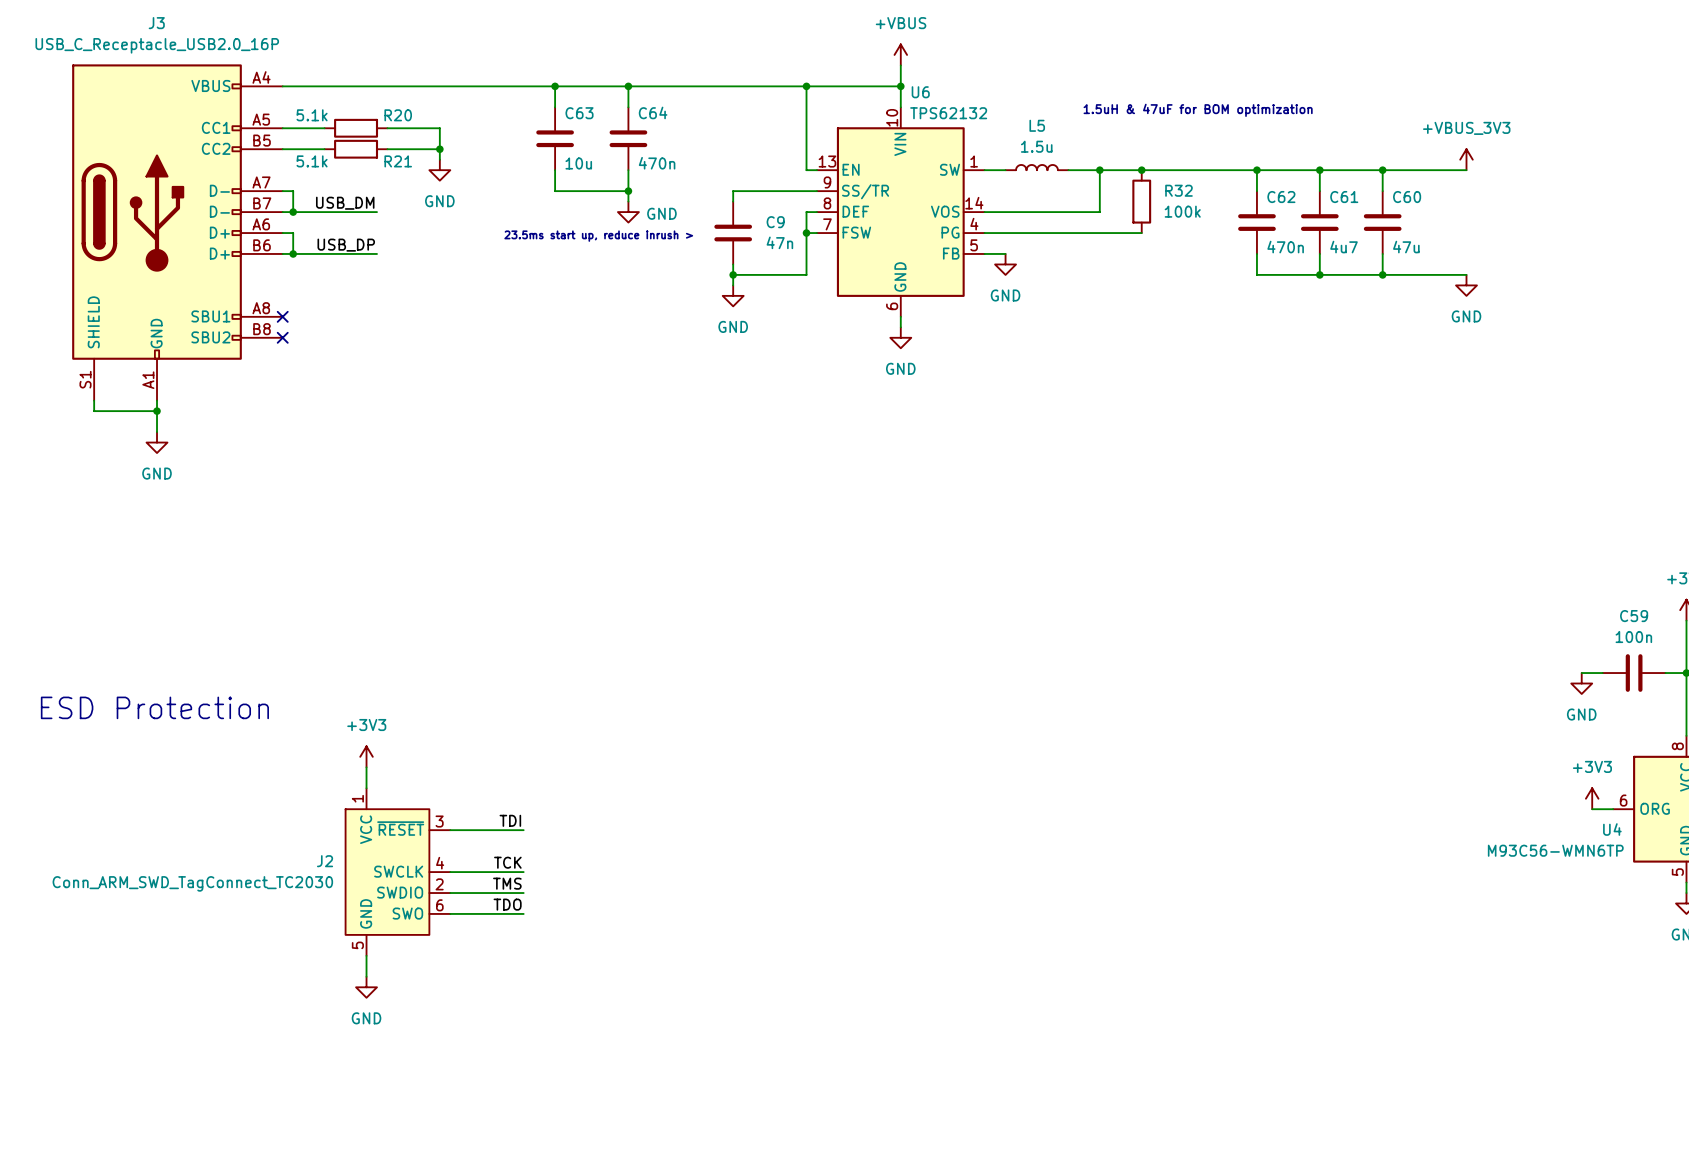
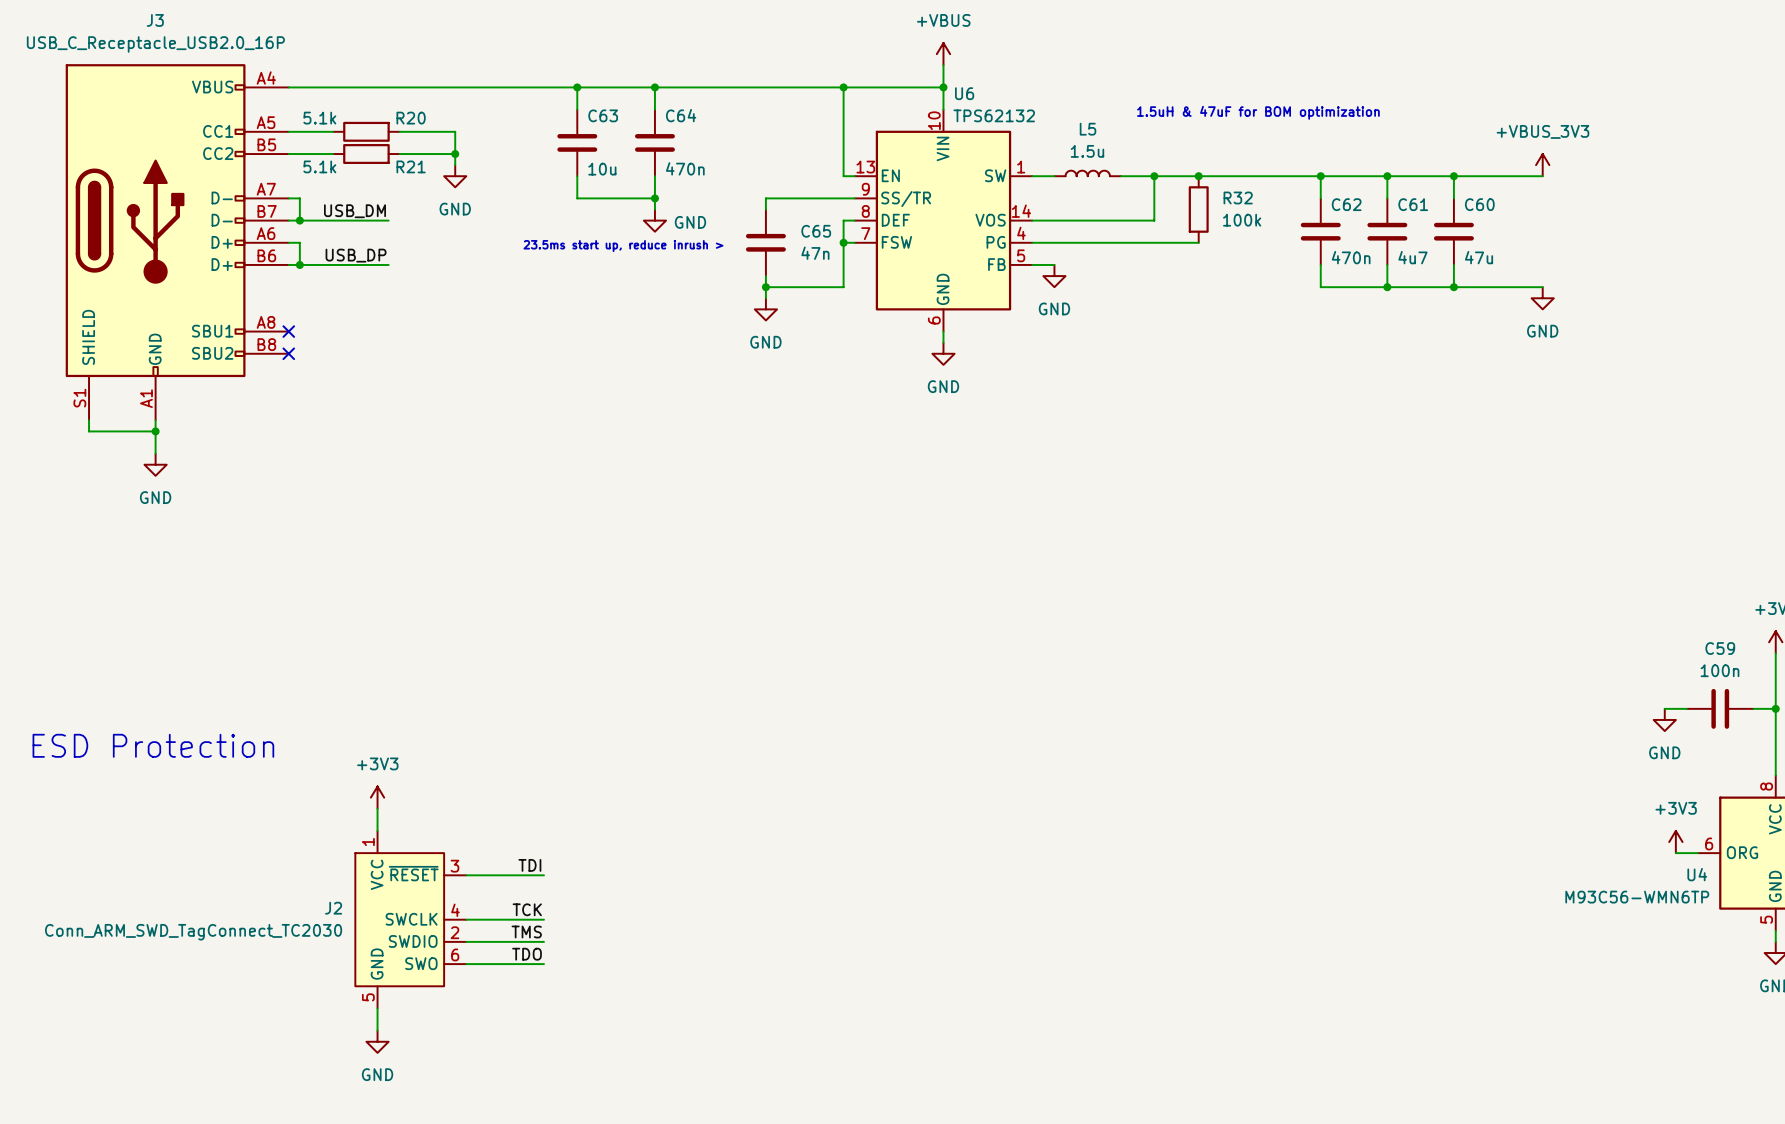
C9 name: C9 (775, 222) -> C65 (816, 231)

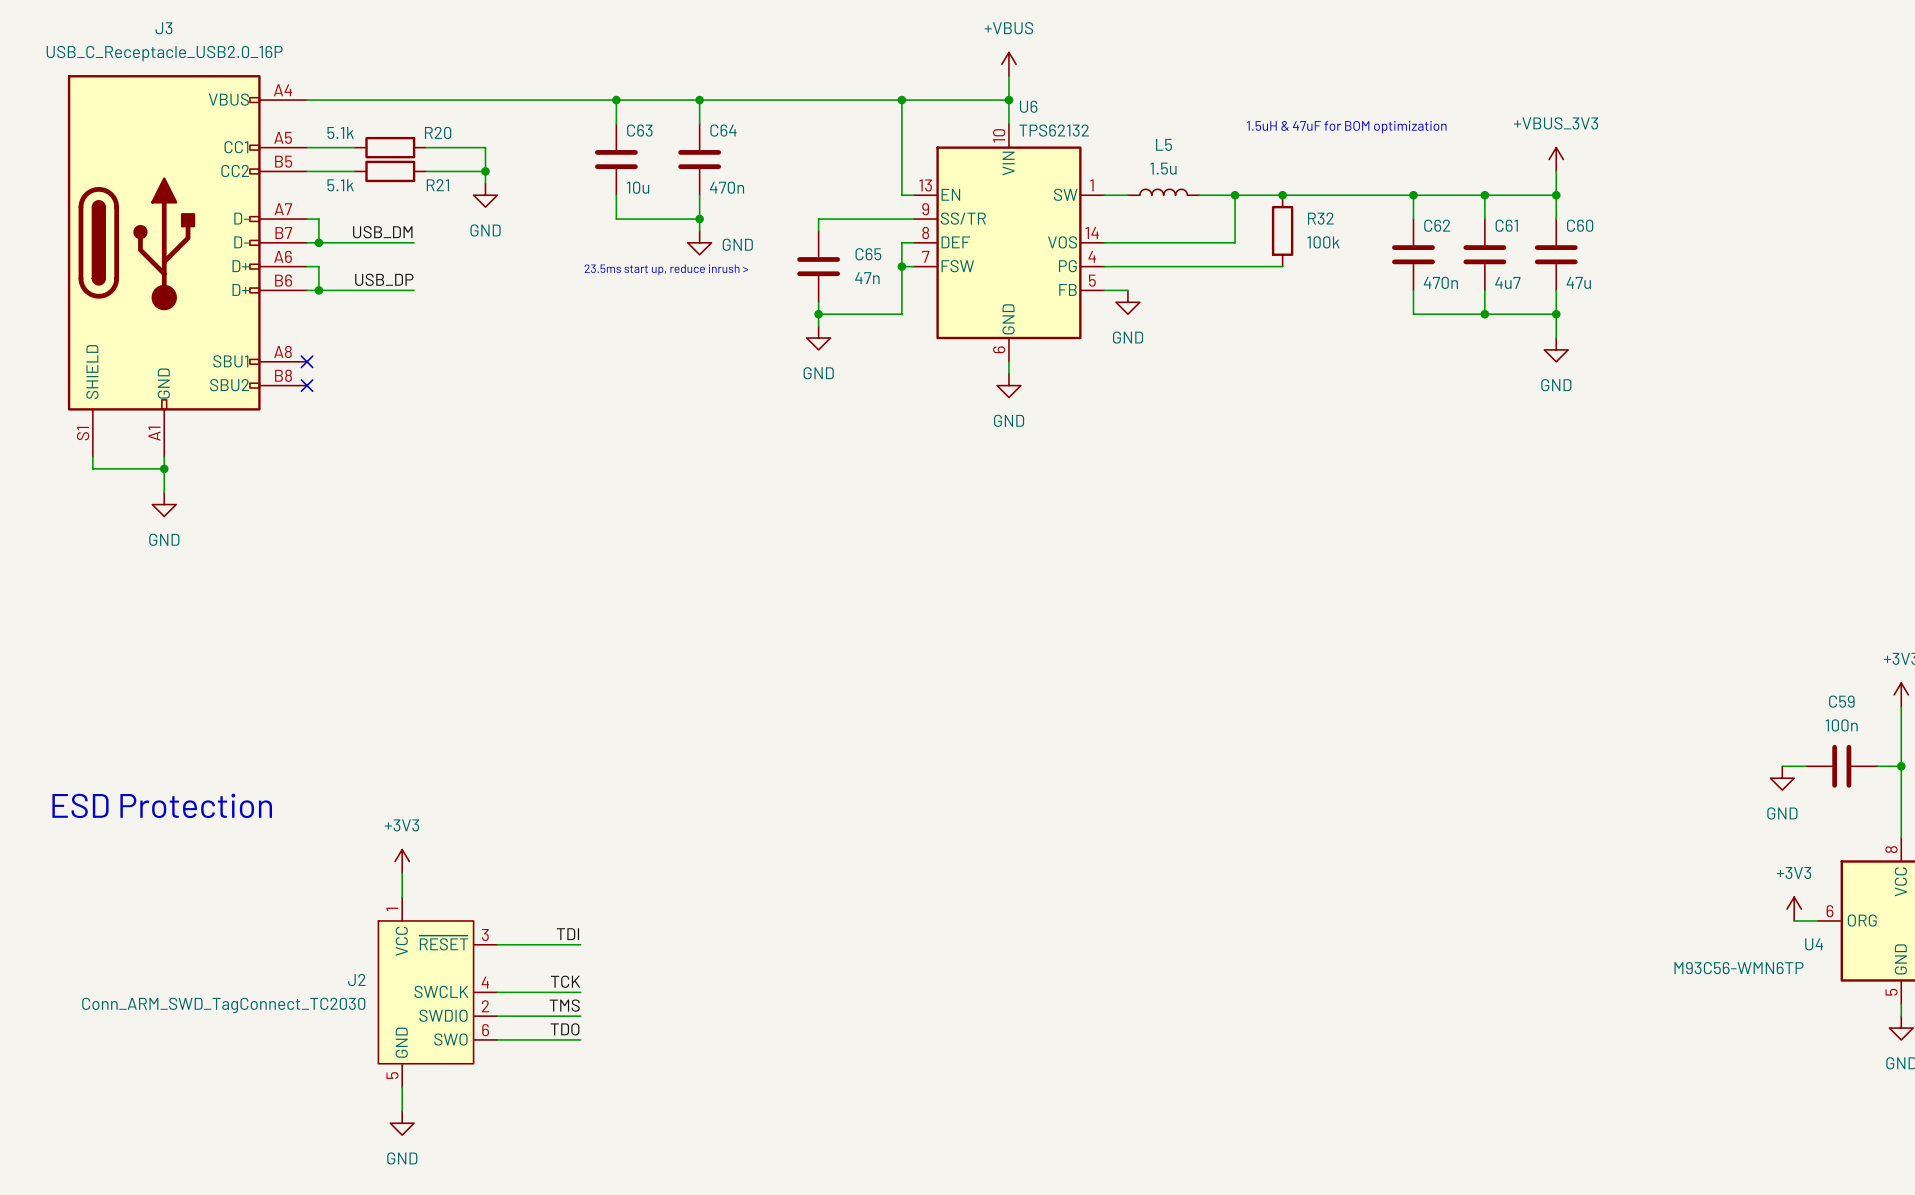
power symbol position: +VBUS_3V3 (1542, 165) -> +VBUS_3V3 (1556, 159)
wire: (1453, 176) (1542, 176) -> (1556, 195) (1556, 171)
wire: (1453, 287) (1542, 287) -> (1556, 314) (1556, 338)
power symbol position: GND (1542, 298) -> GND (1556, 349)

